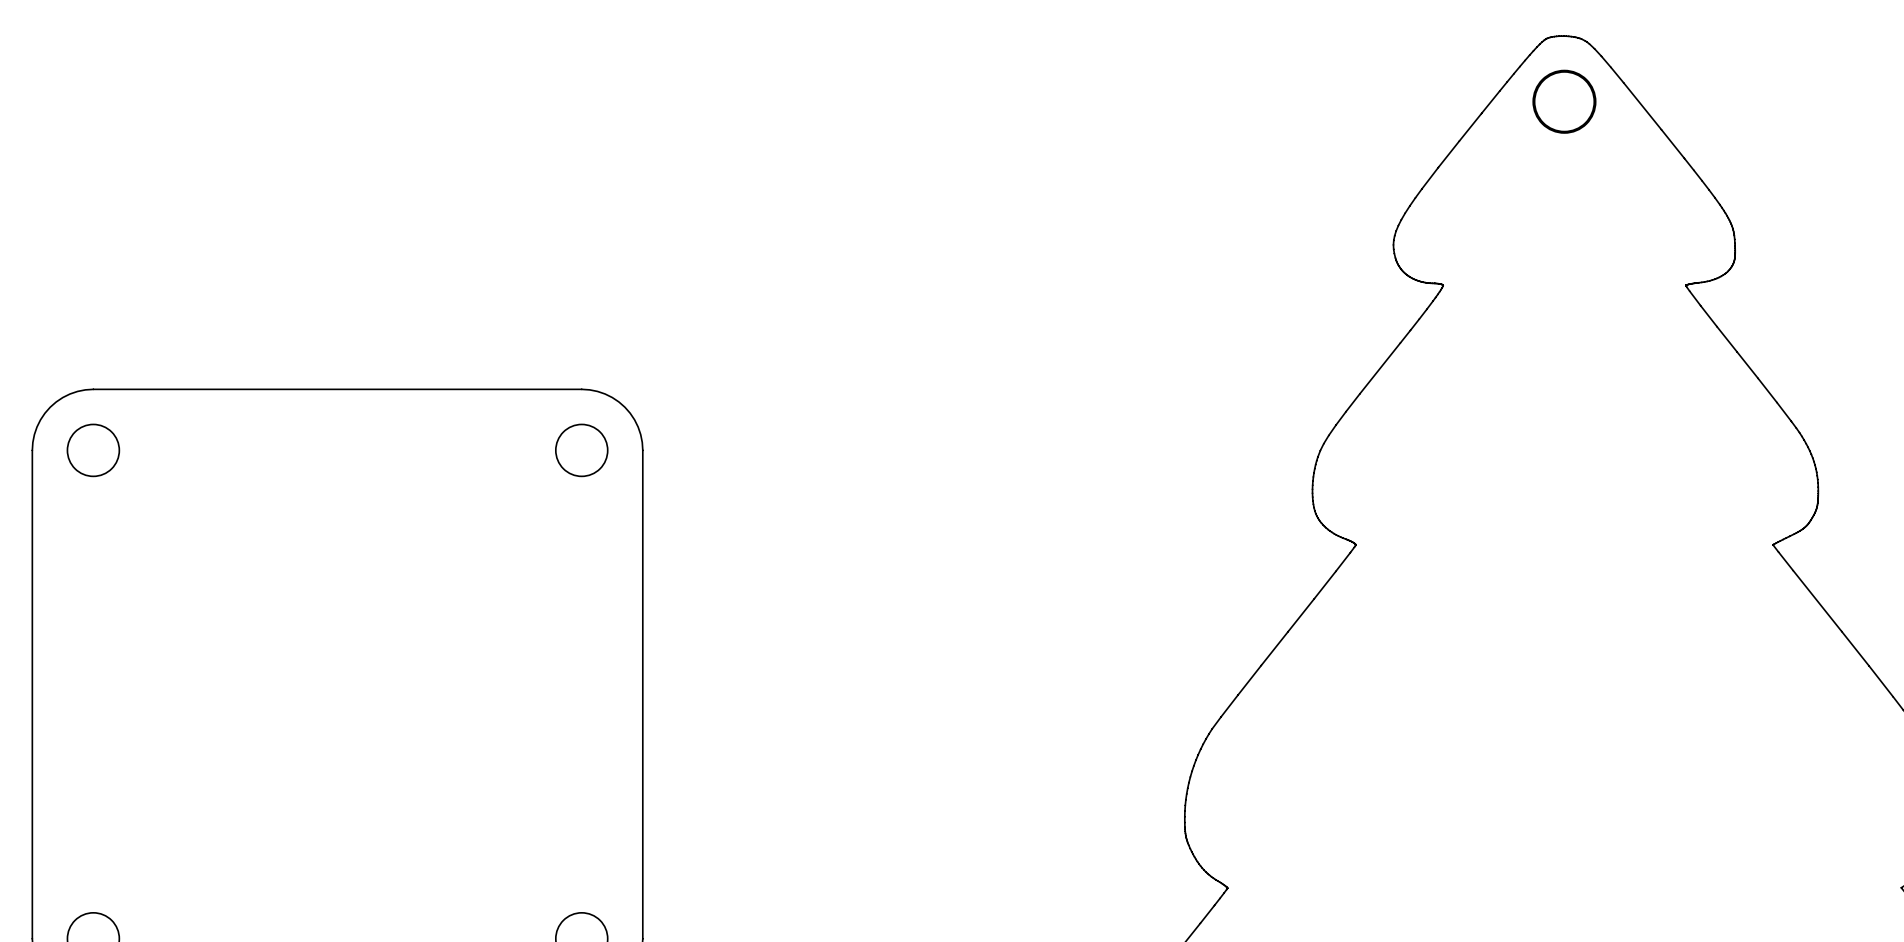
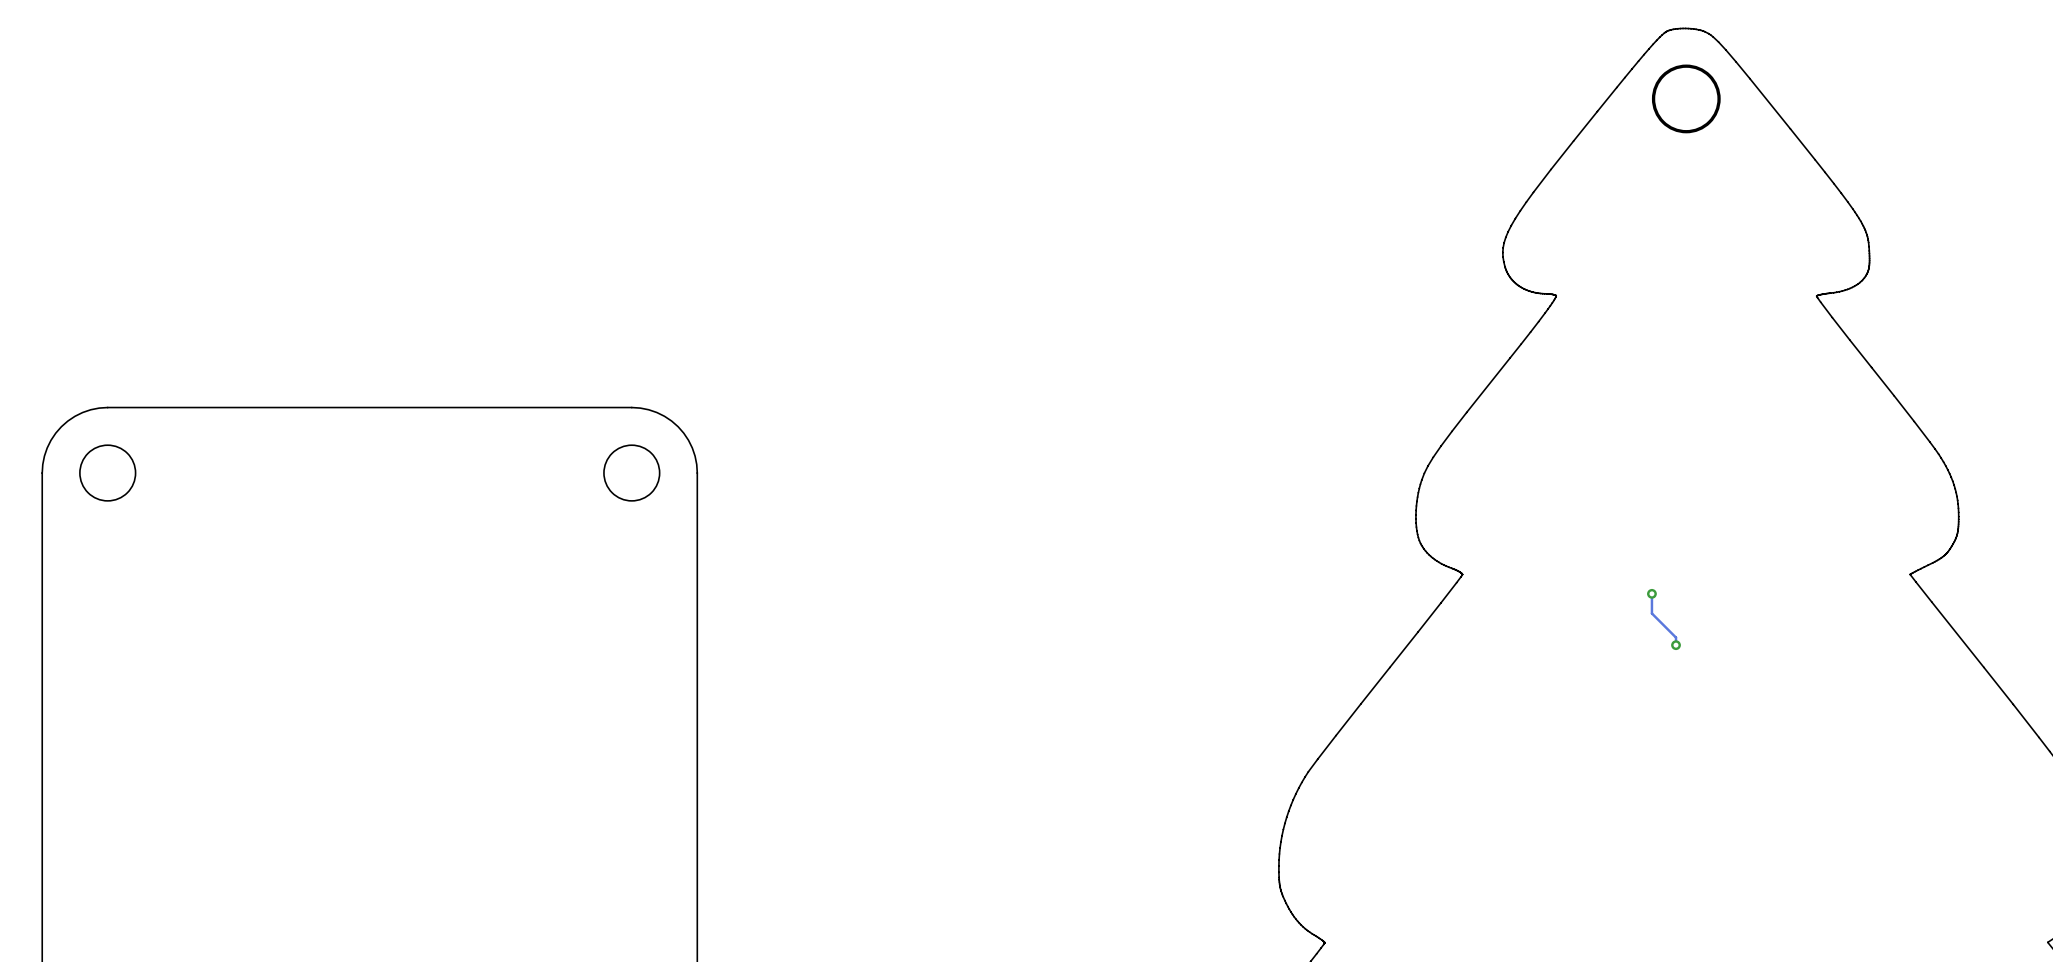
track: none -> (1651, 593) (1651, 613) (1676, 637) (1676, 645)
via: none -> (1651, 593)
via: none -> (1676, 645)

